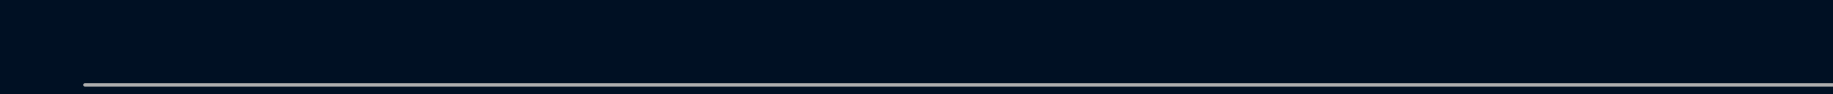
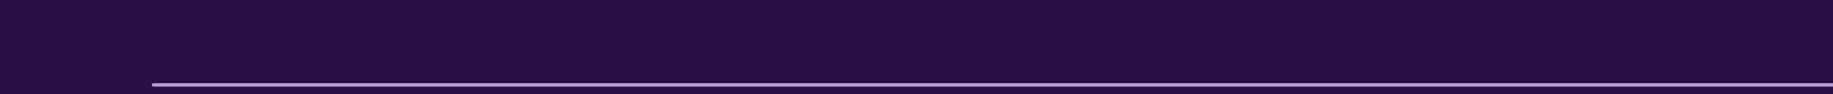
line: (84, 84) (153, 84) -> none

